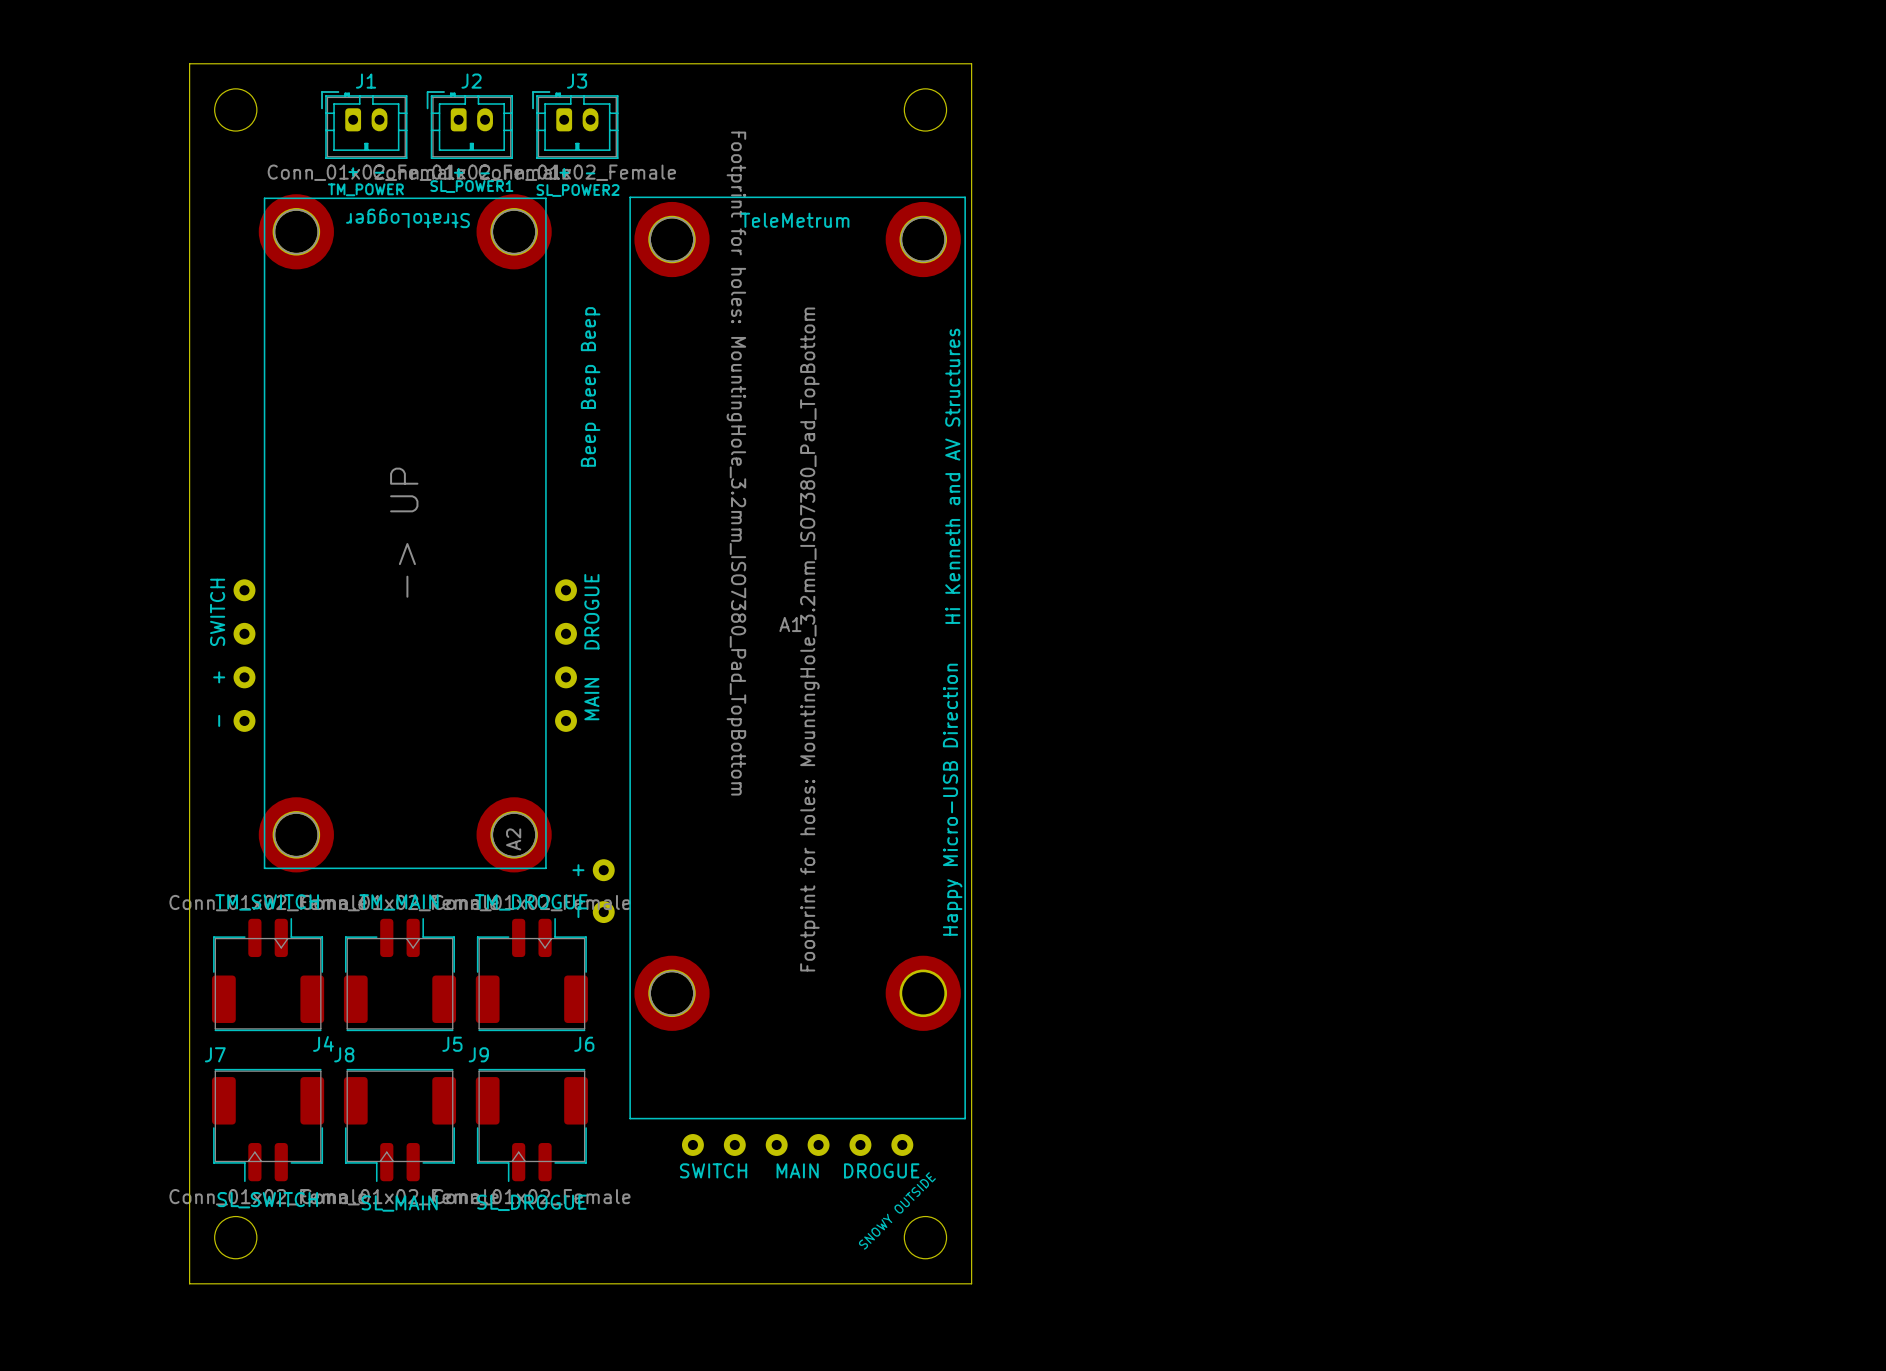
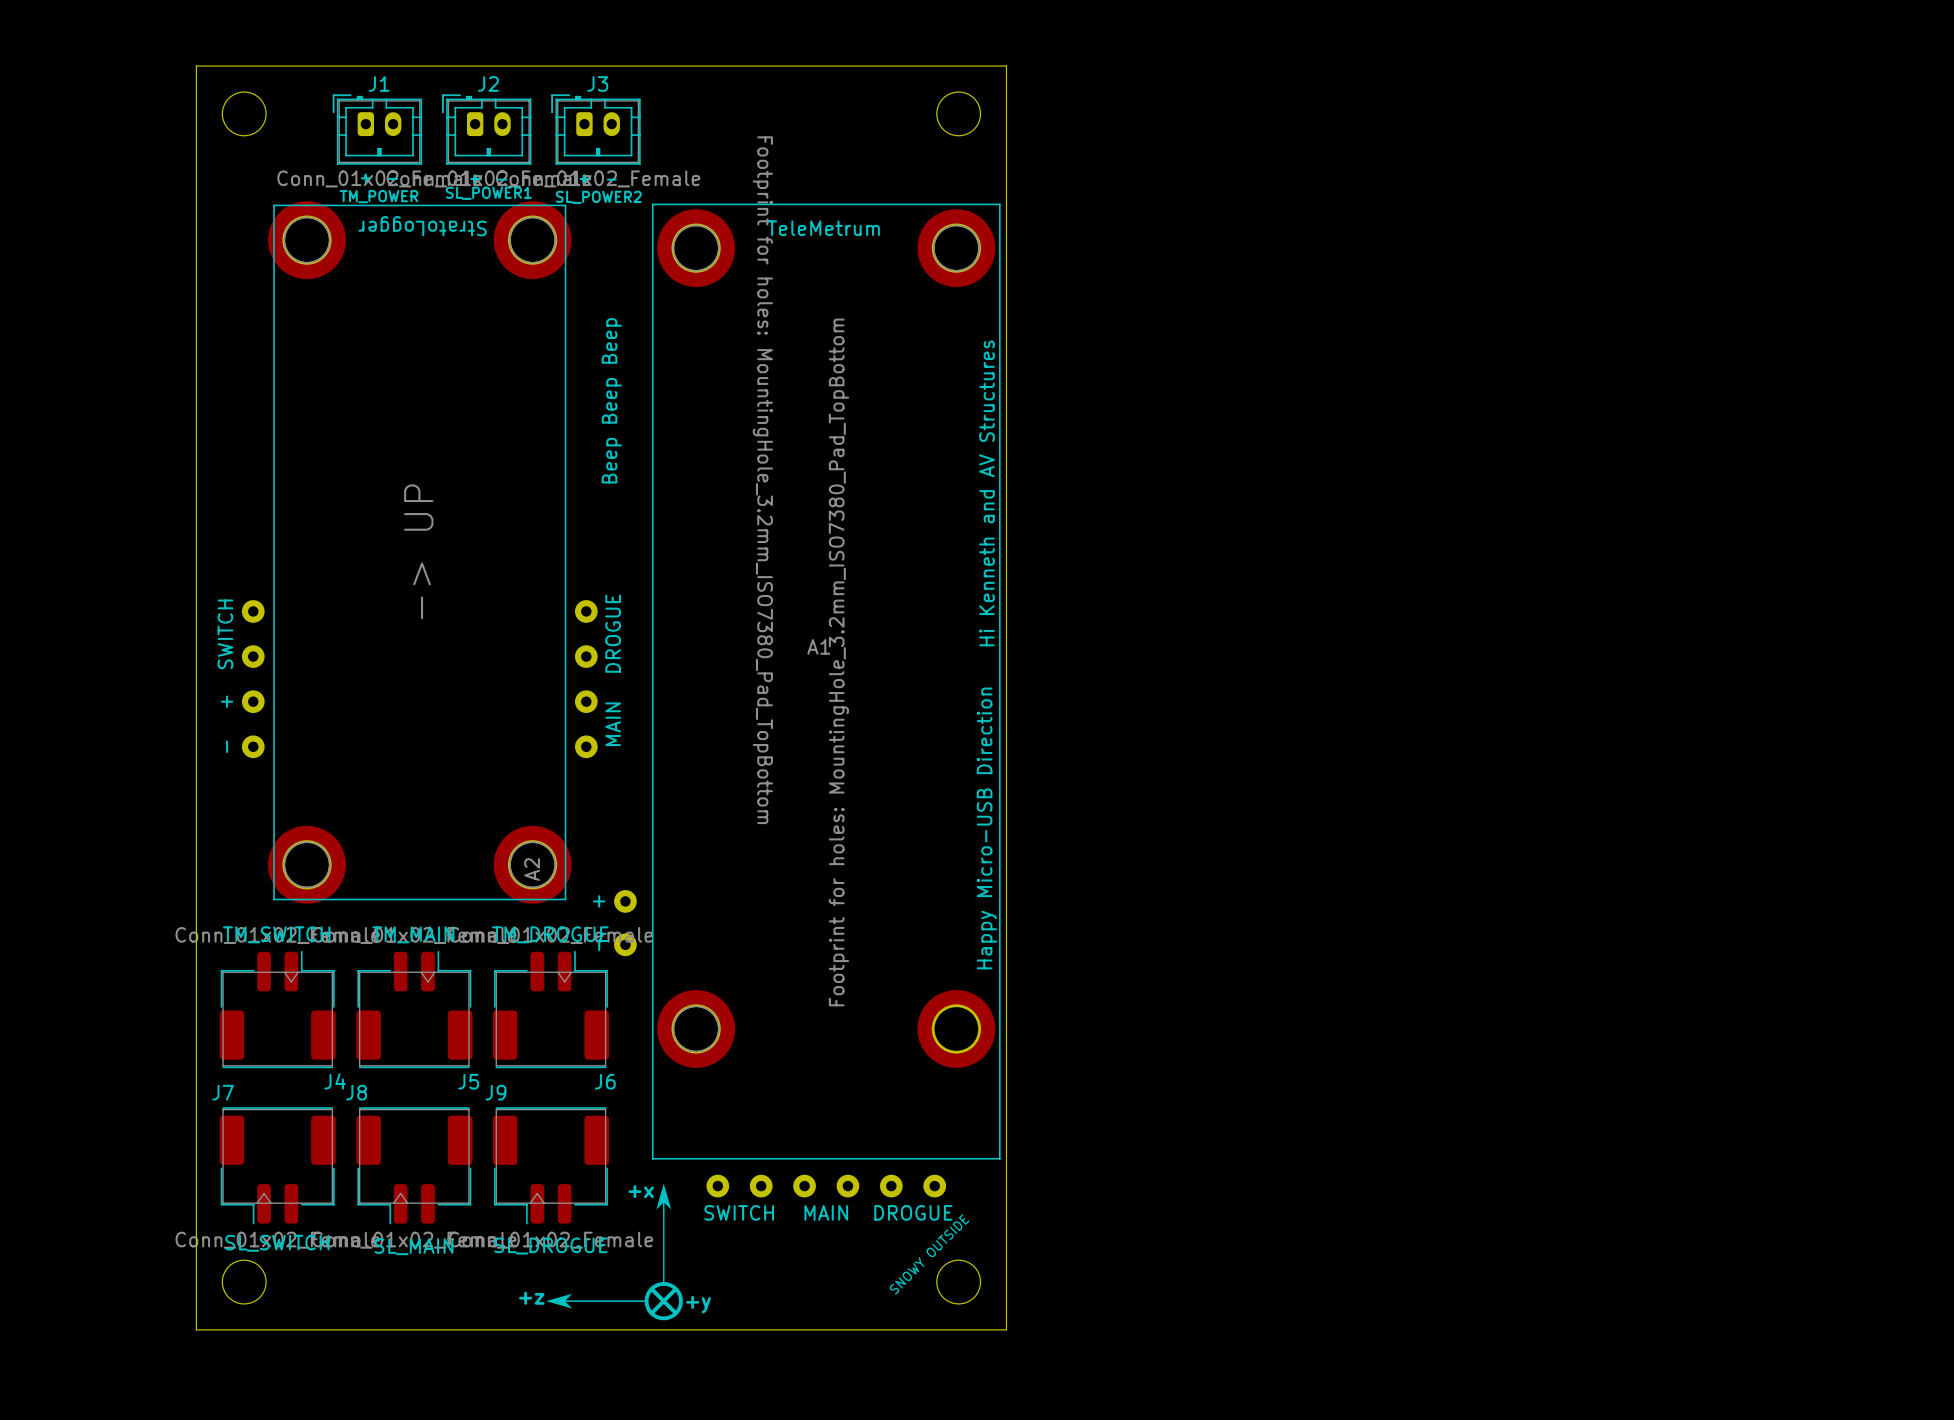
drawing: none -> [546, 1183, 683, 1321]
text: none -> +x (641, 1191)
text: none -> +z (531, 1298)
text: none -> +y (698, 1304)

